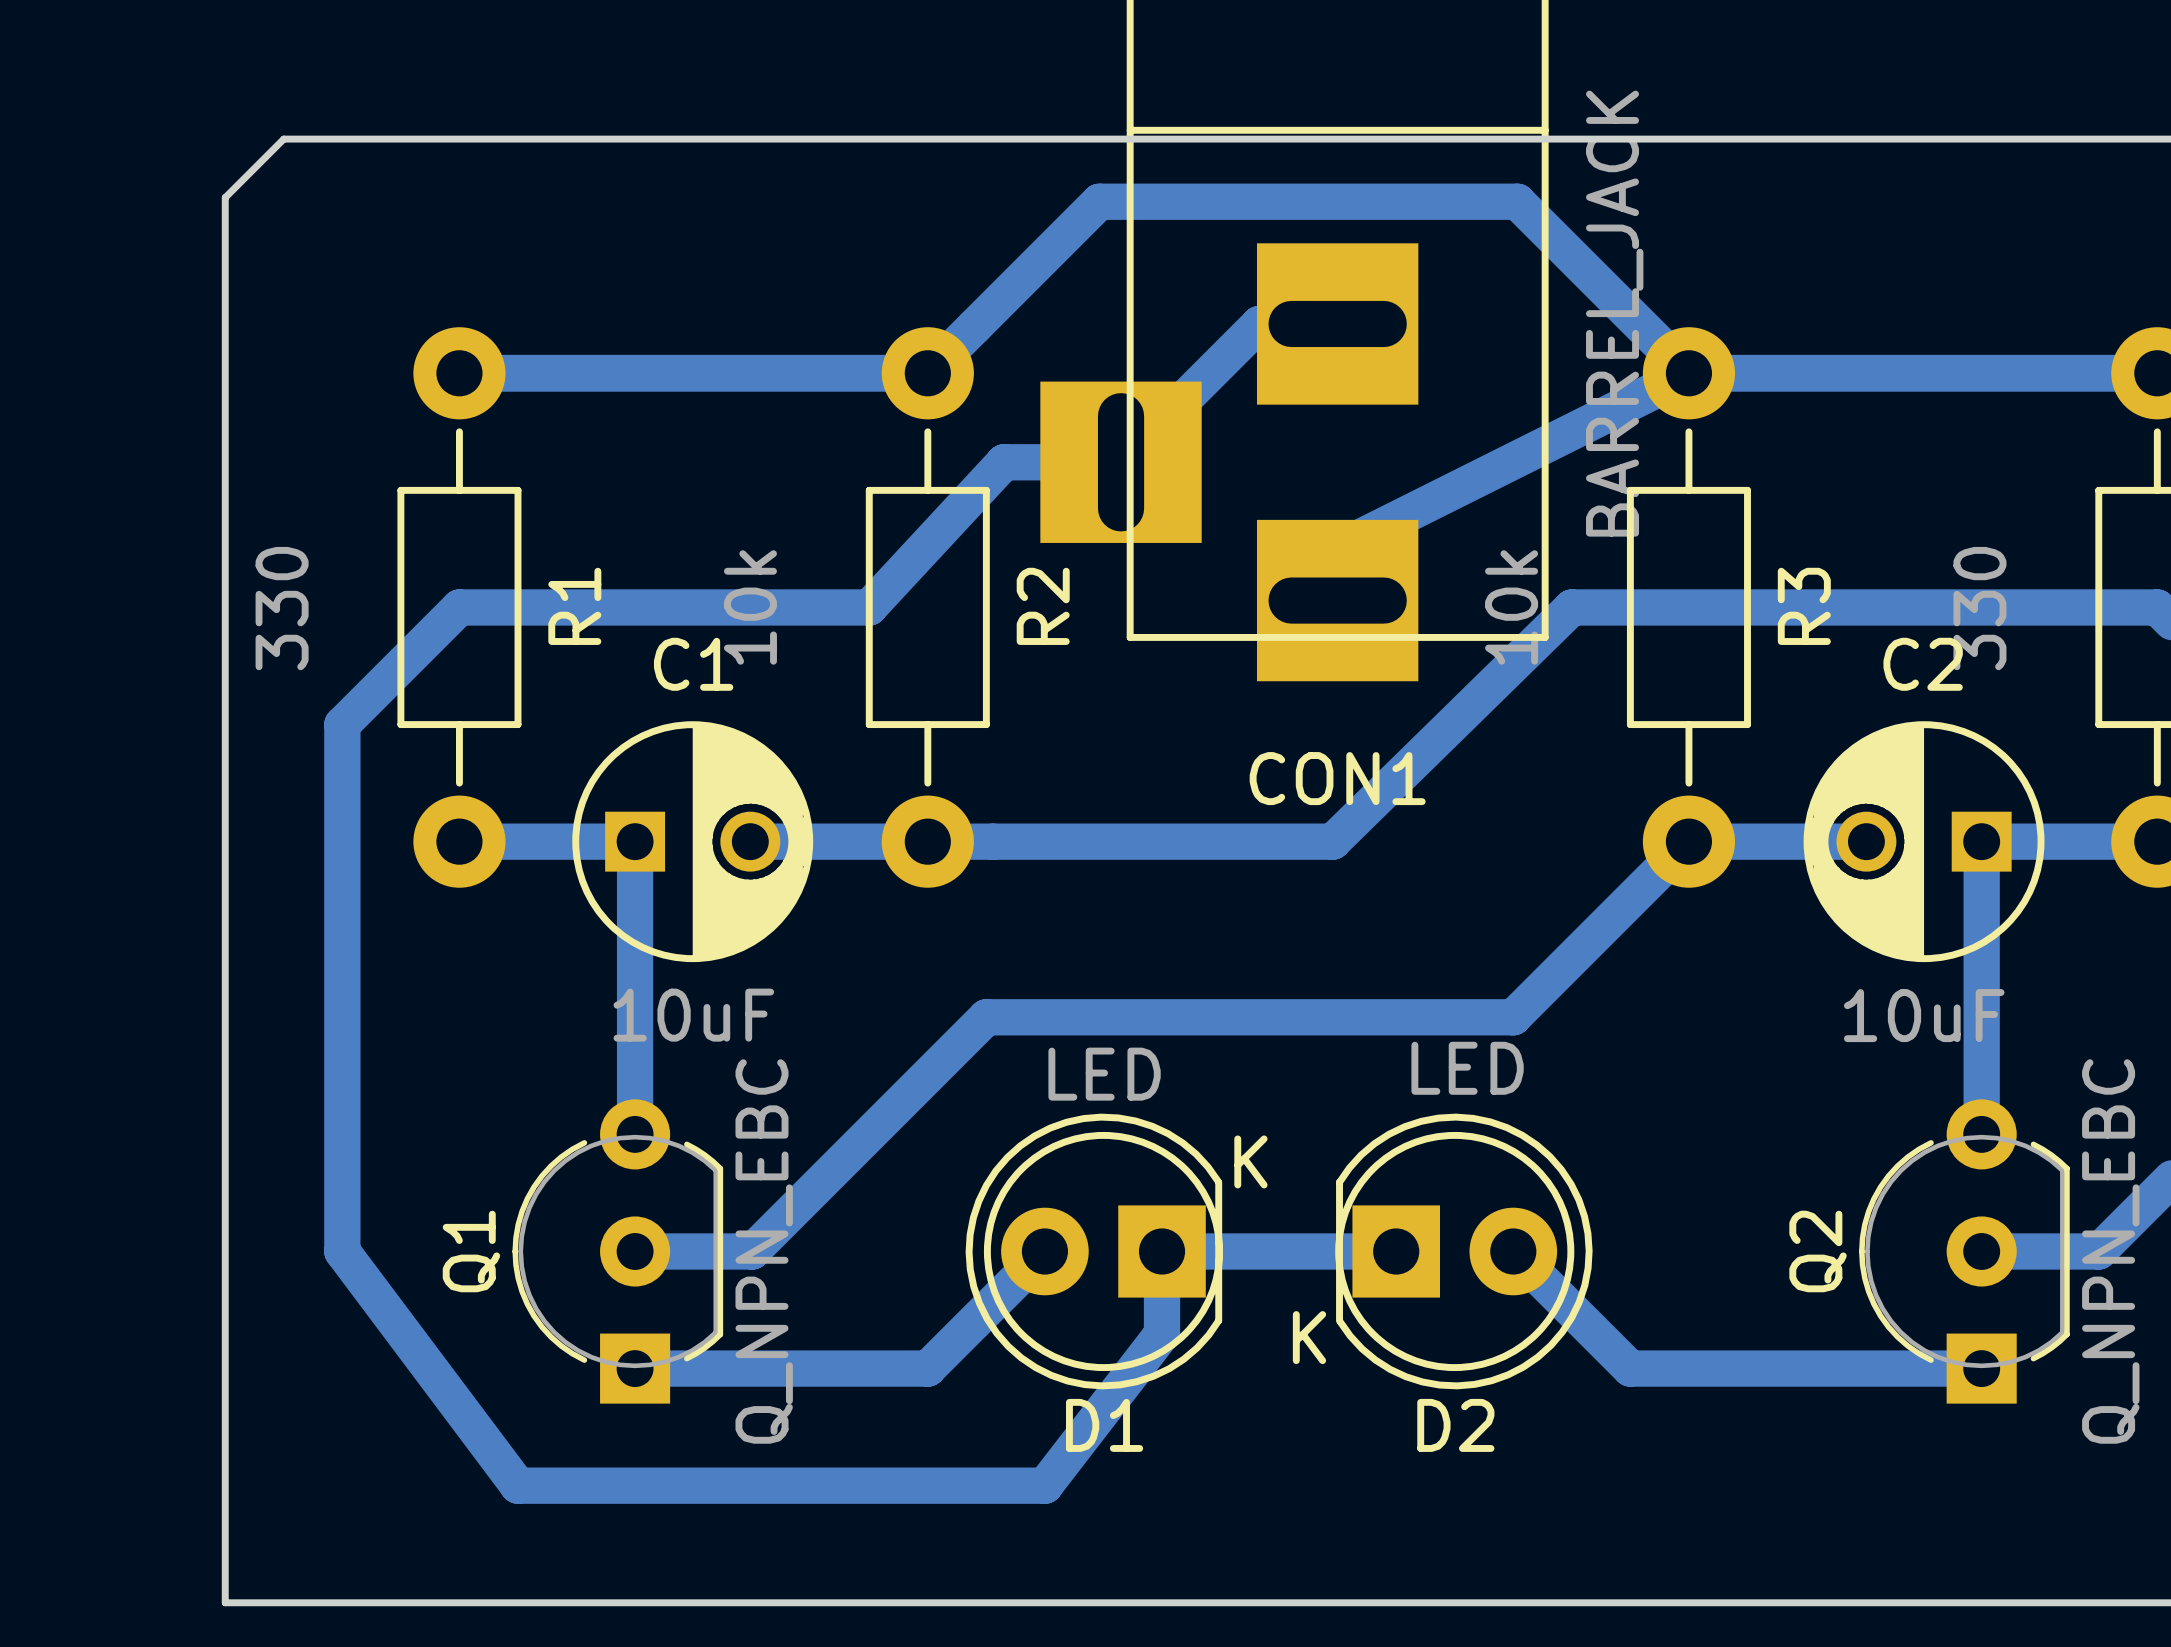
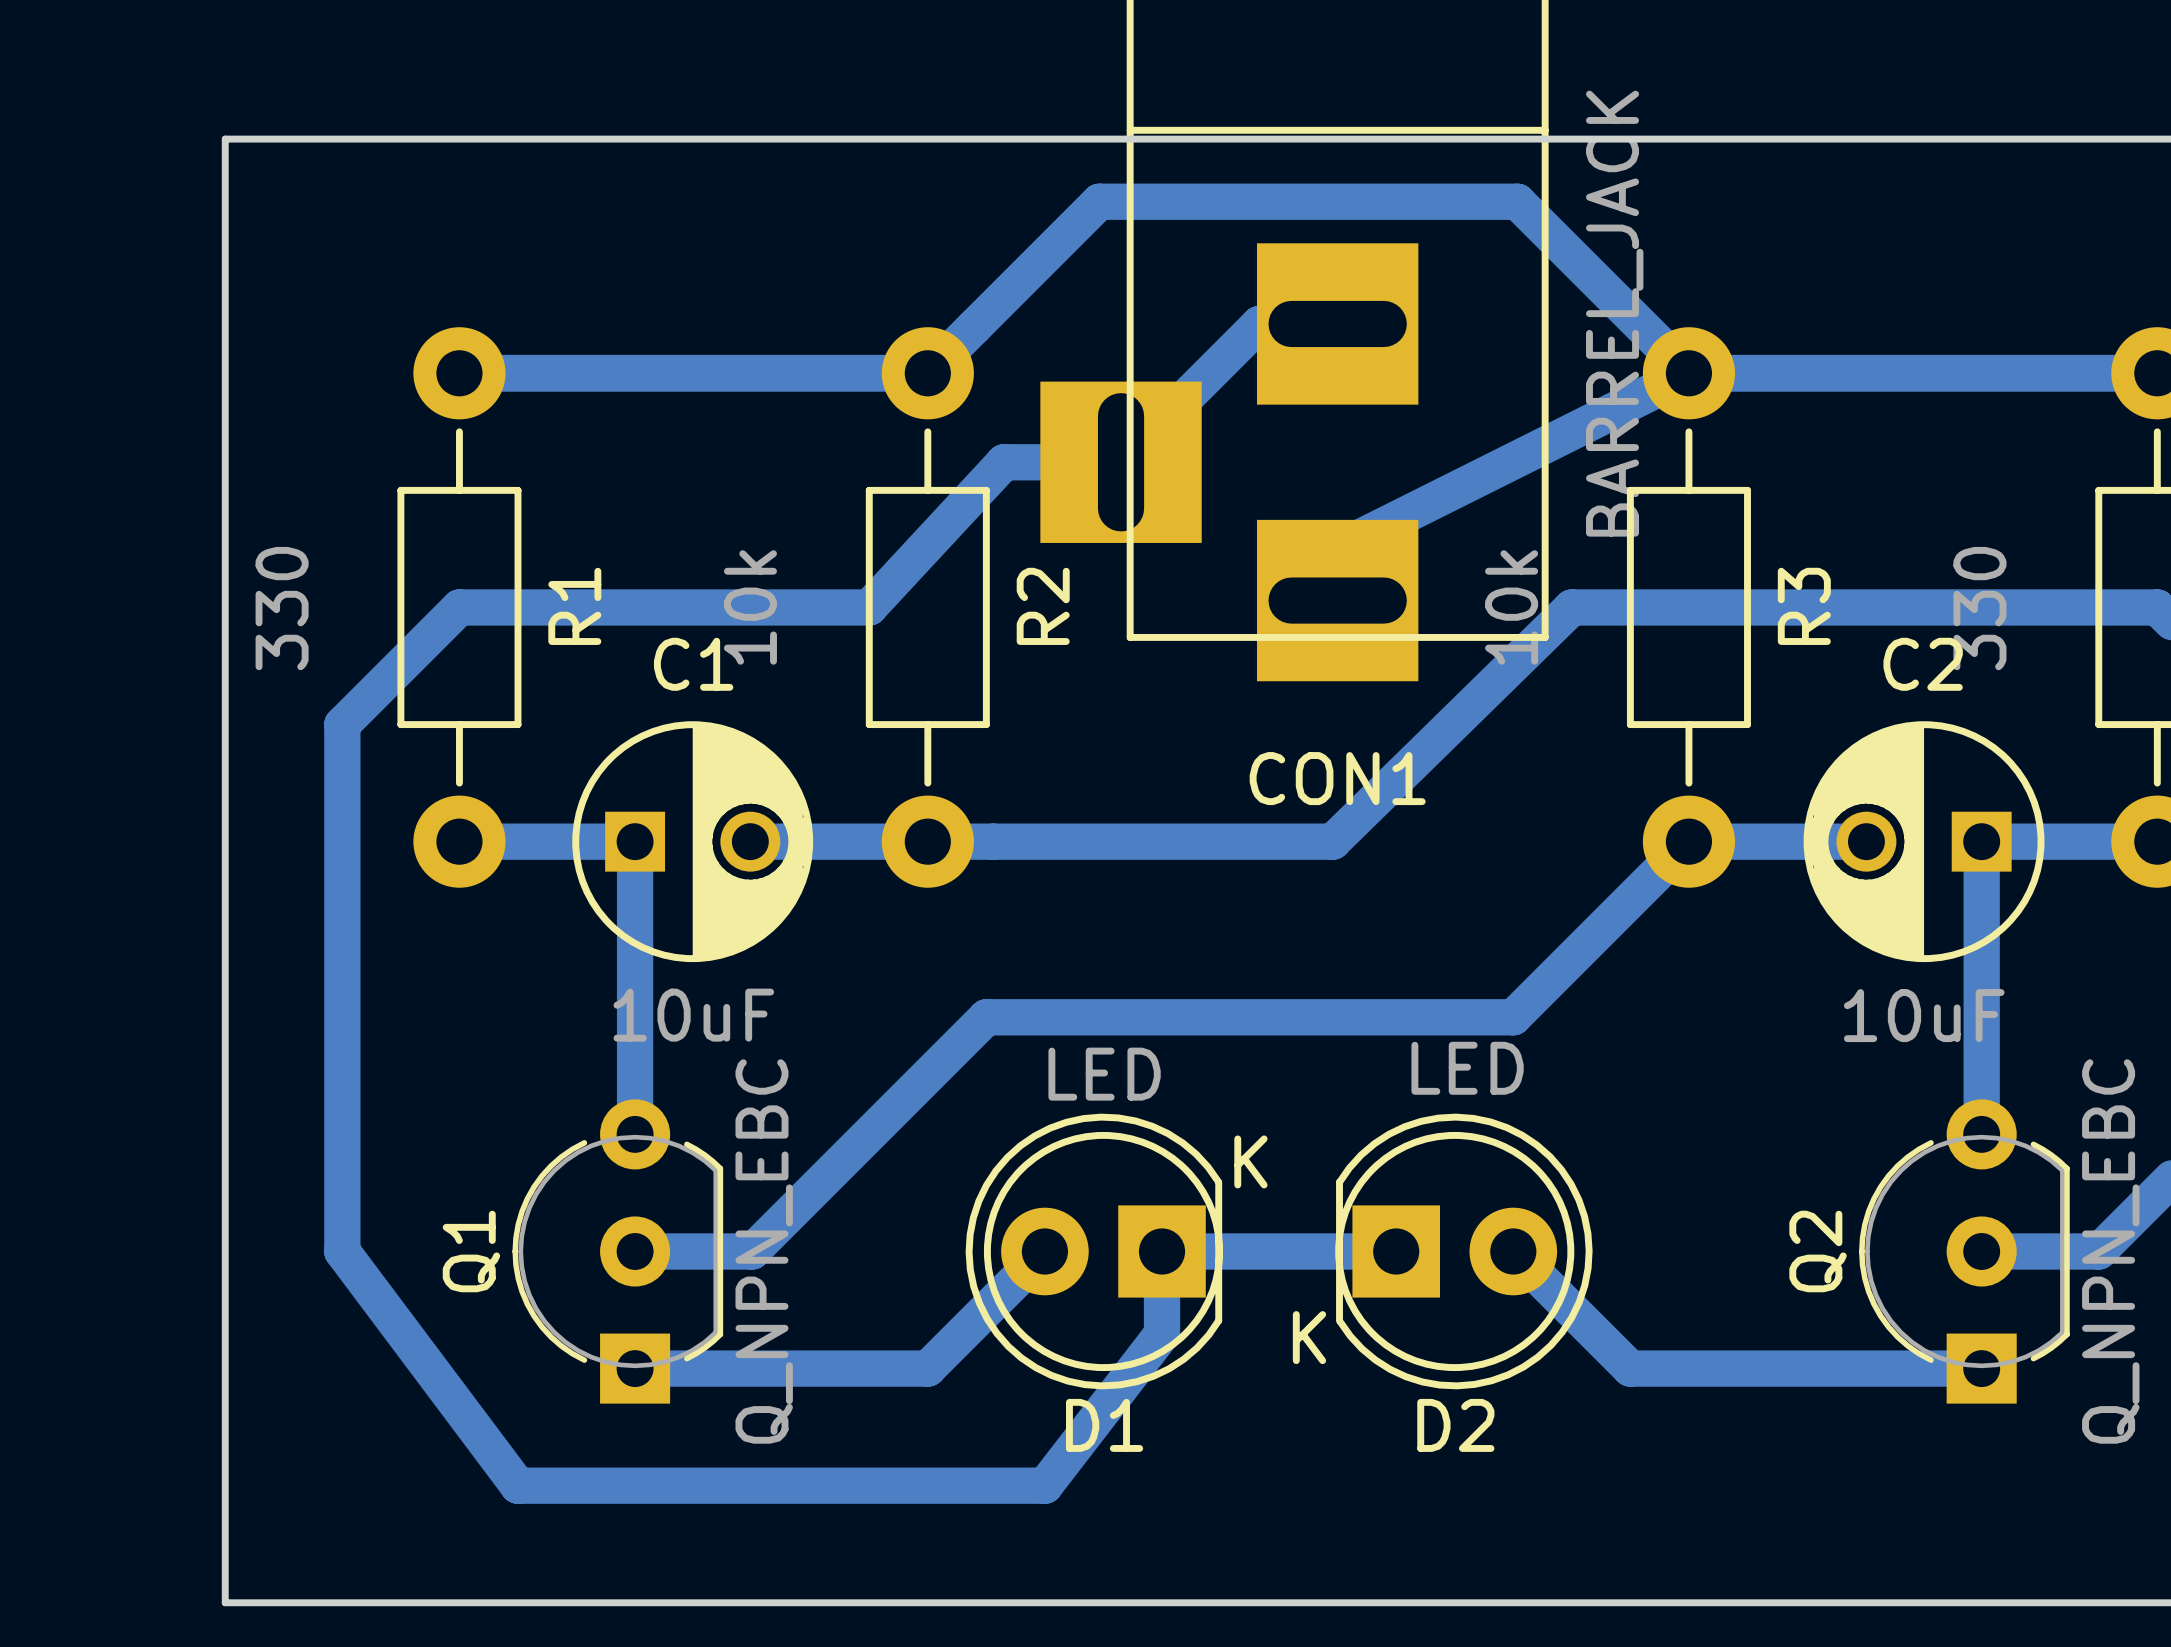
board edge: (283, 139) (225, 197) -> (283, 139) (225, 139) (225, 197)

